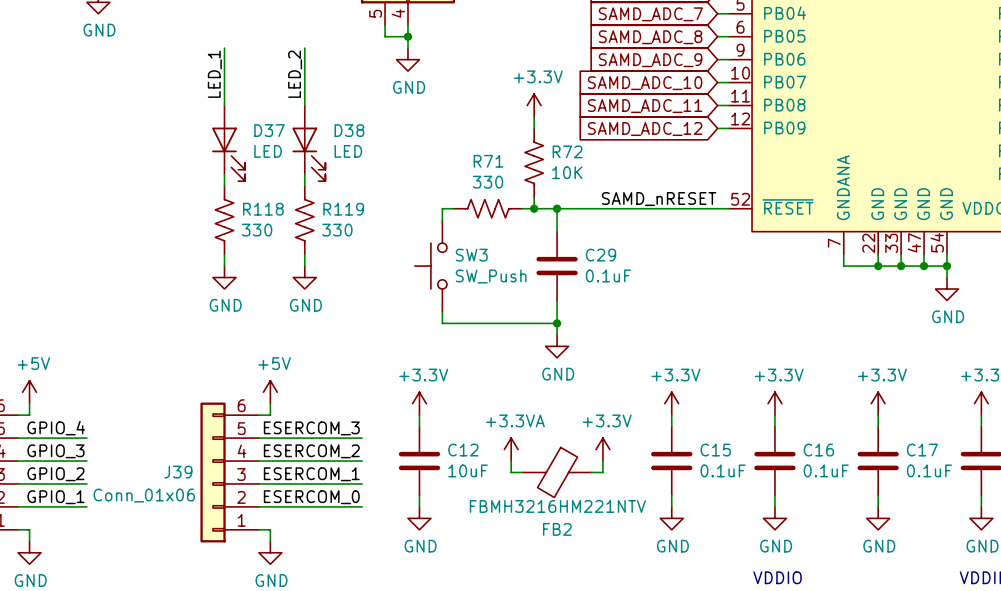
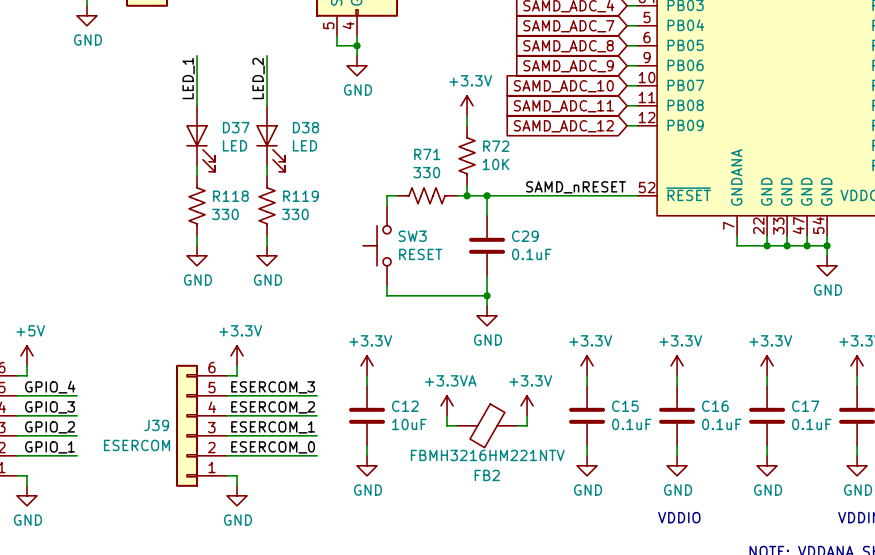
SW3 value: SW_Push (491, 276) -> RESET (420, 254)
power symbol: +5V (270, 392) -> +3.3V (237, 355)
J39 value: Conn_01x06 (144, 495) -> ESERCOM (137, 445)

